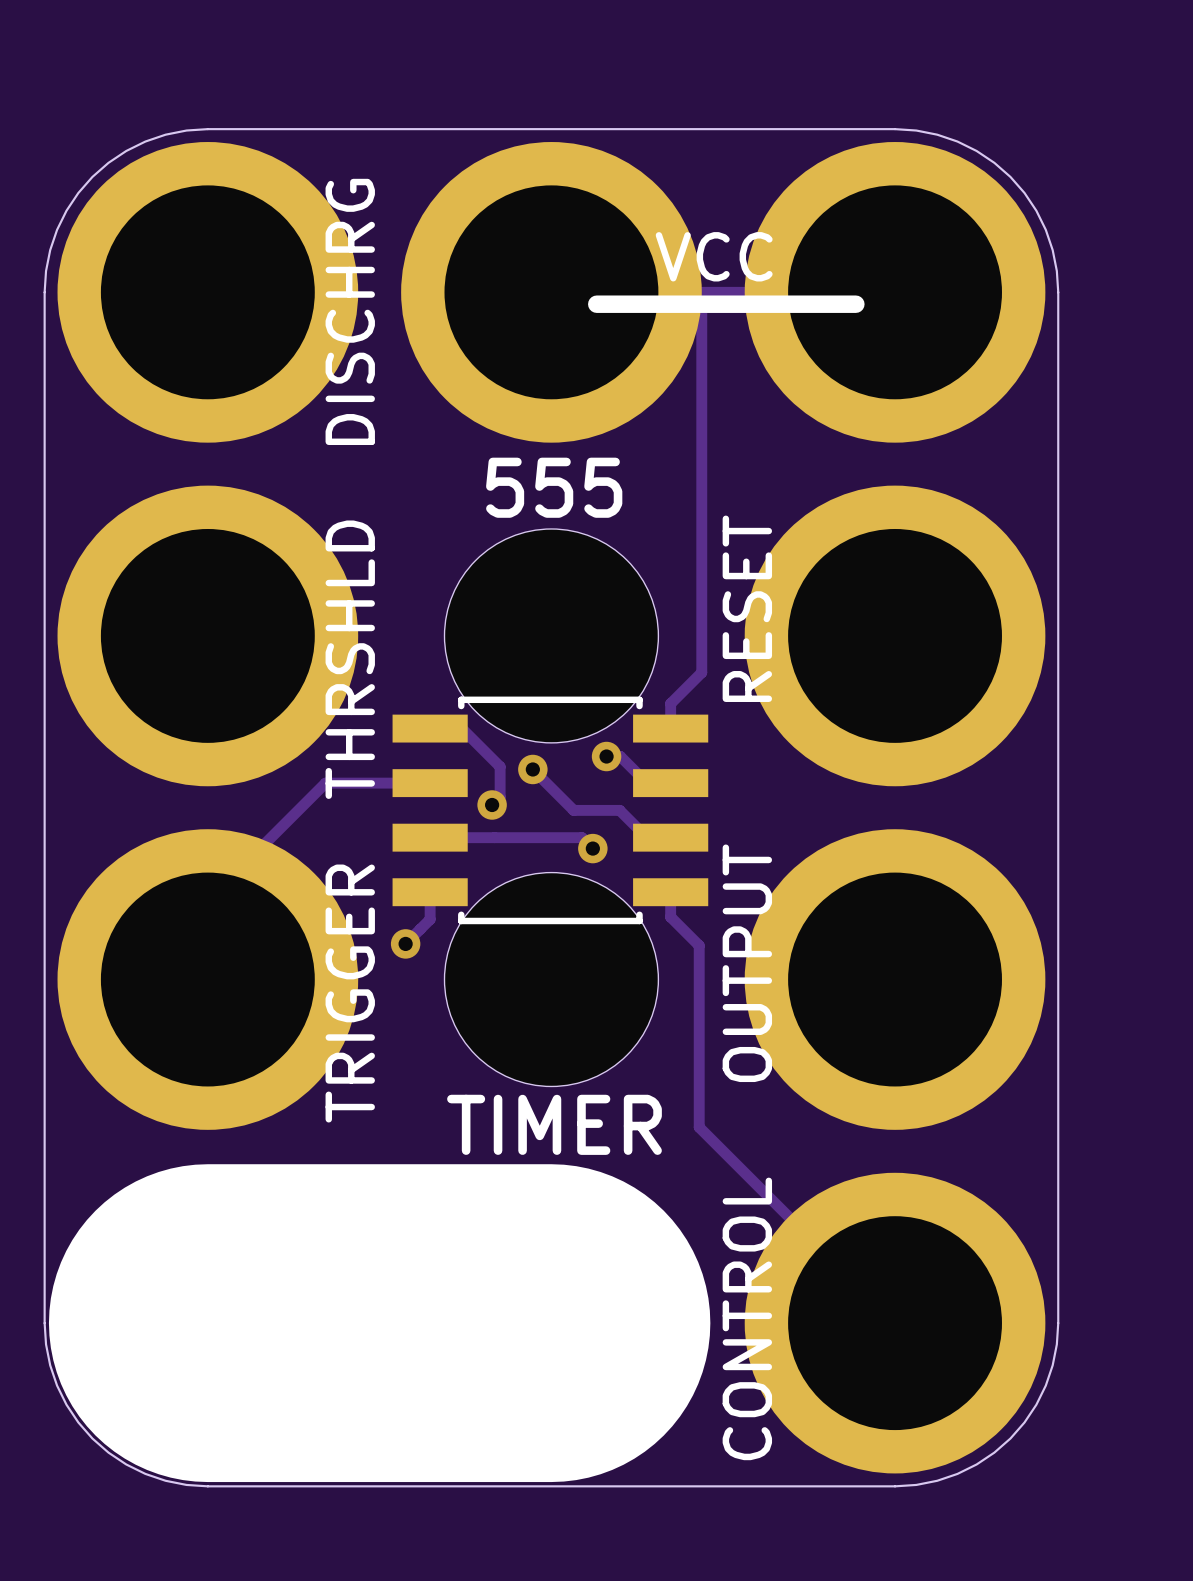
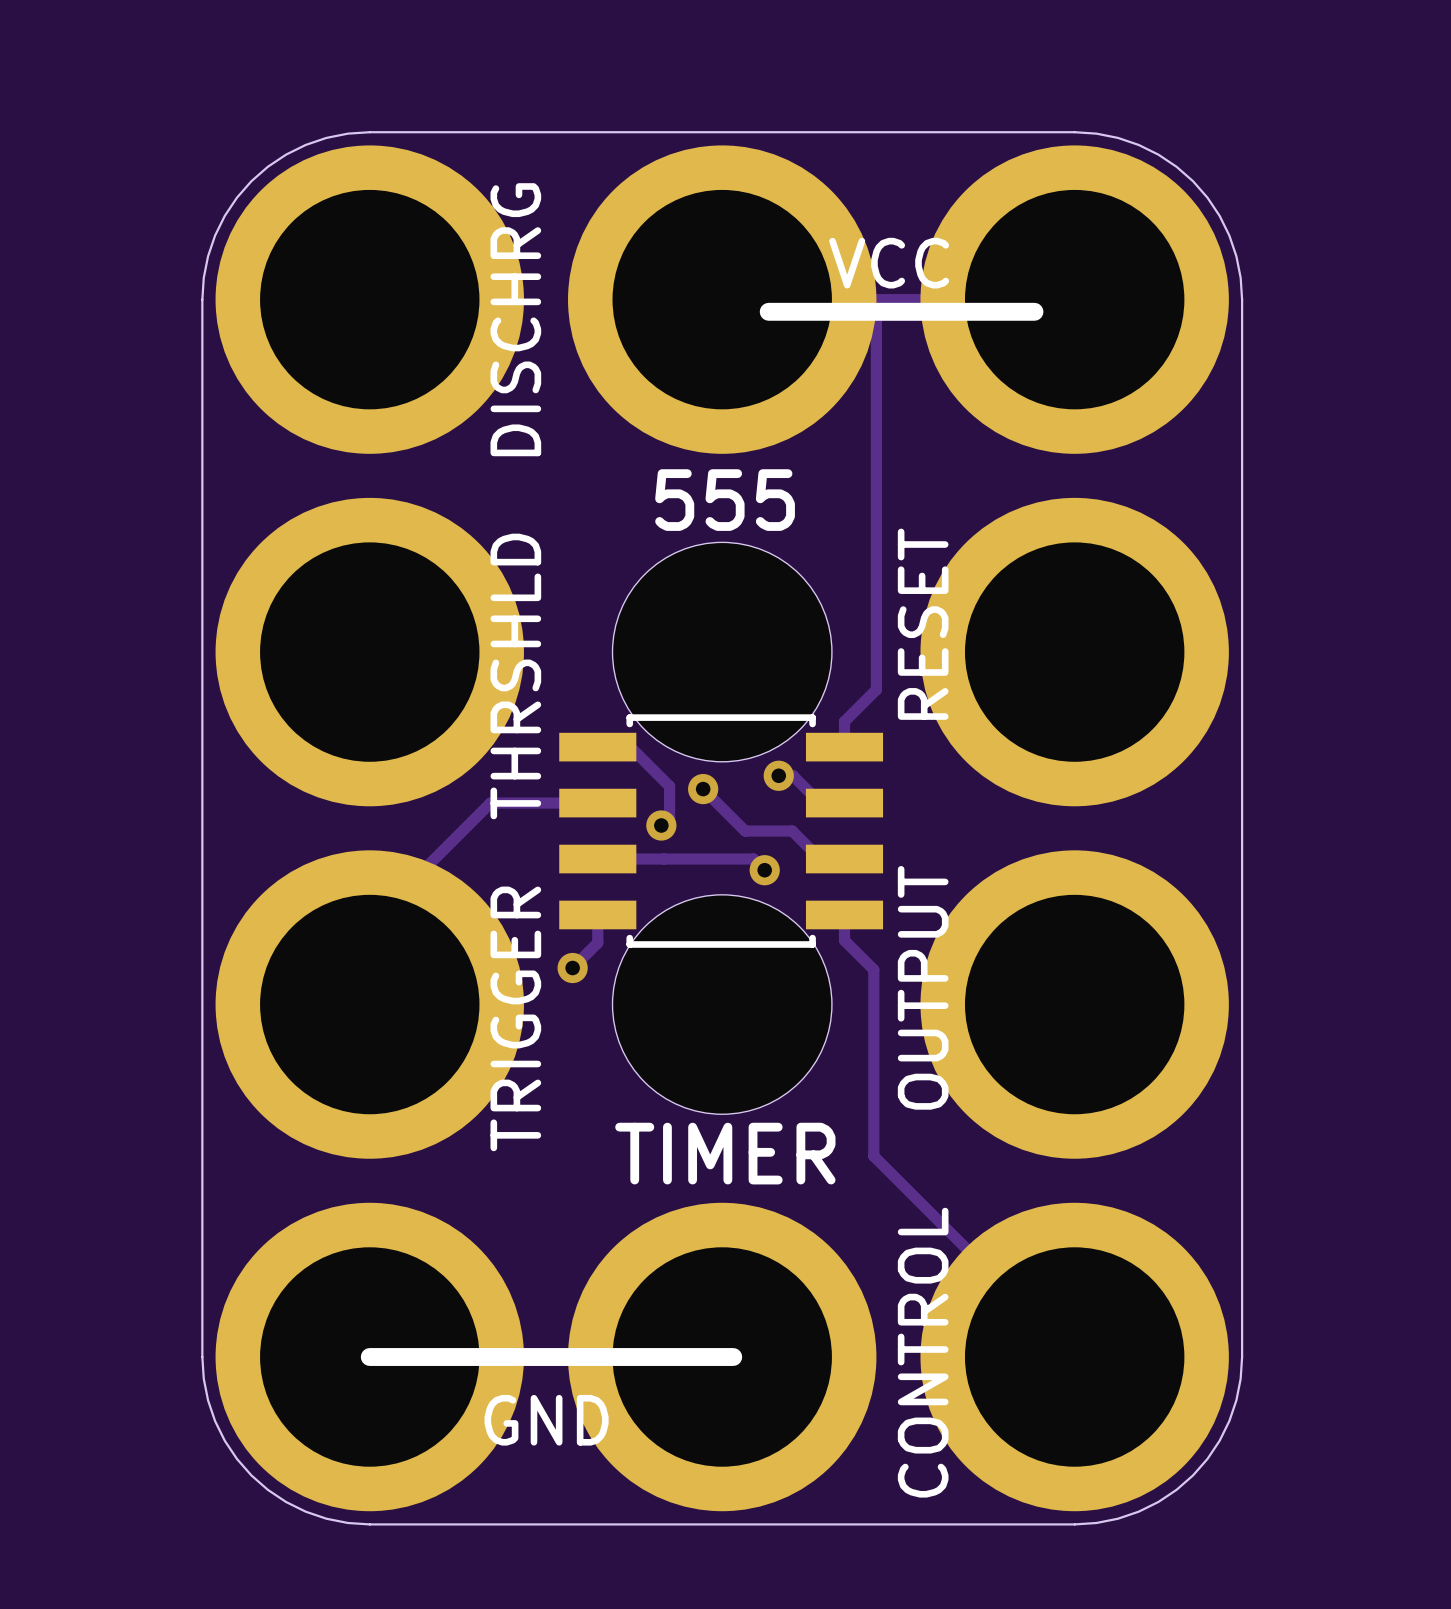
part footprint: [43, 128, 1060, 1488] -> [201, 131, 1244, 1526]

